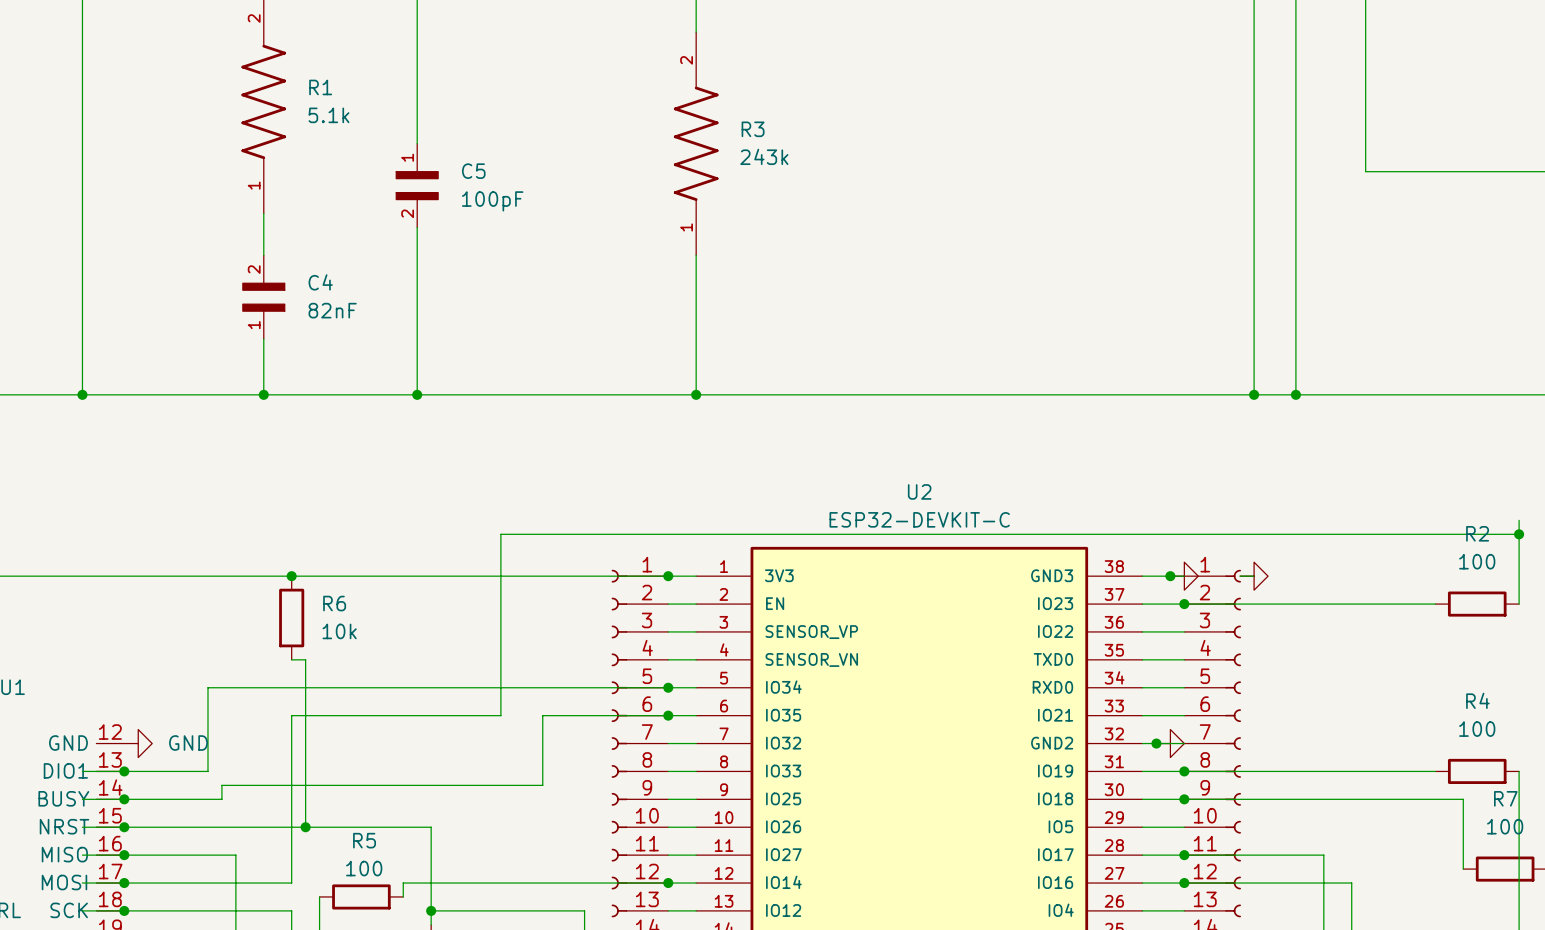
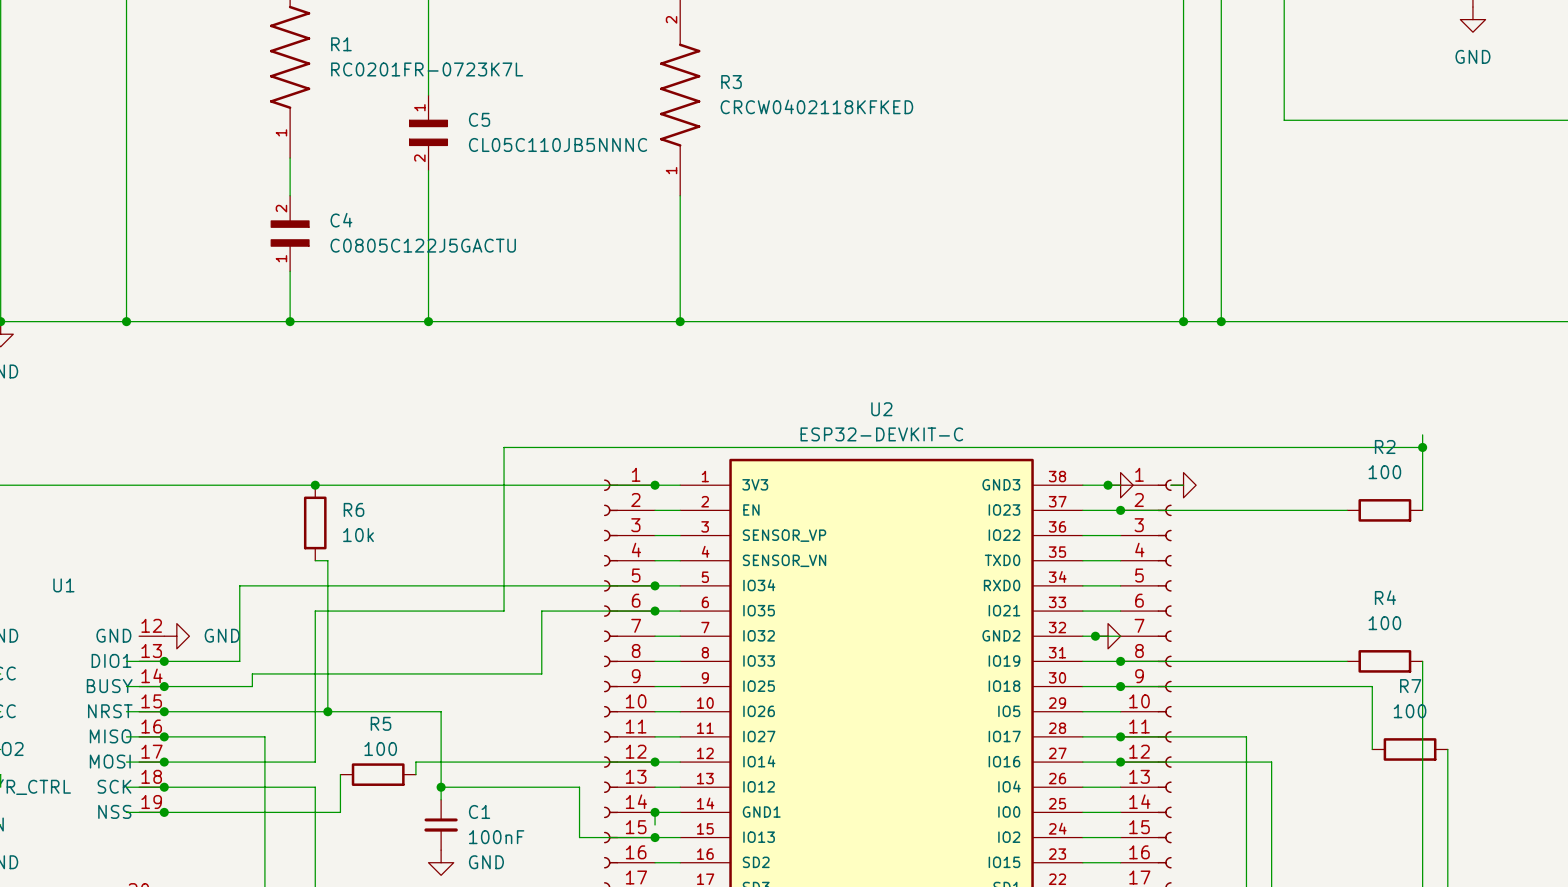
R1 value: 5.1k (328, 115) -> RC0201FR-0723K7L (427, 69)
R3 value: 243k (764, 156) -> CRCW0402118KFKED (816, 106)
C5 value: 100pF (492, 201) -> CL05C110JB5NNNC (558, 144)
C4 value: 82nF (332, 310) -> C0805C122J5GACTU (423, 245)

